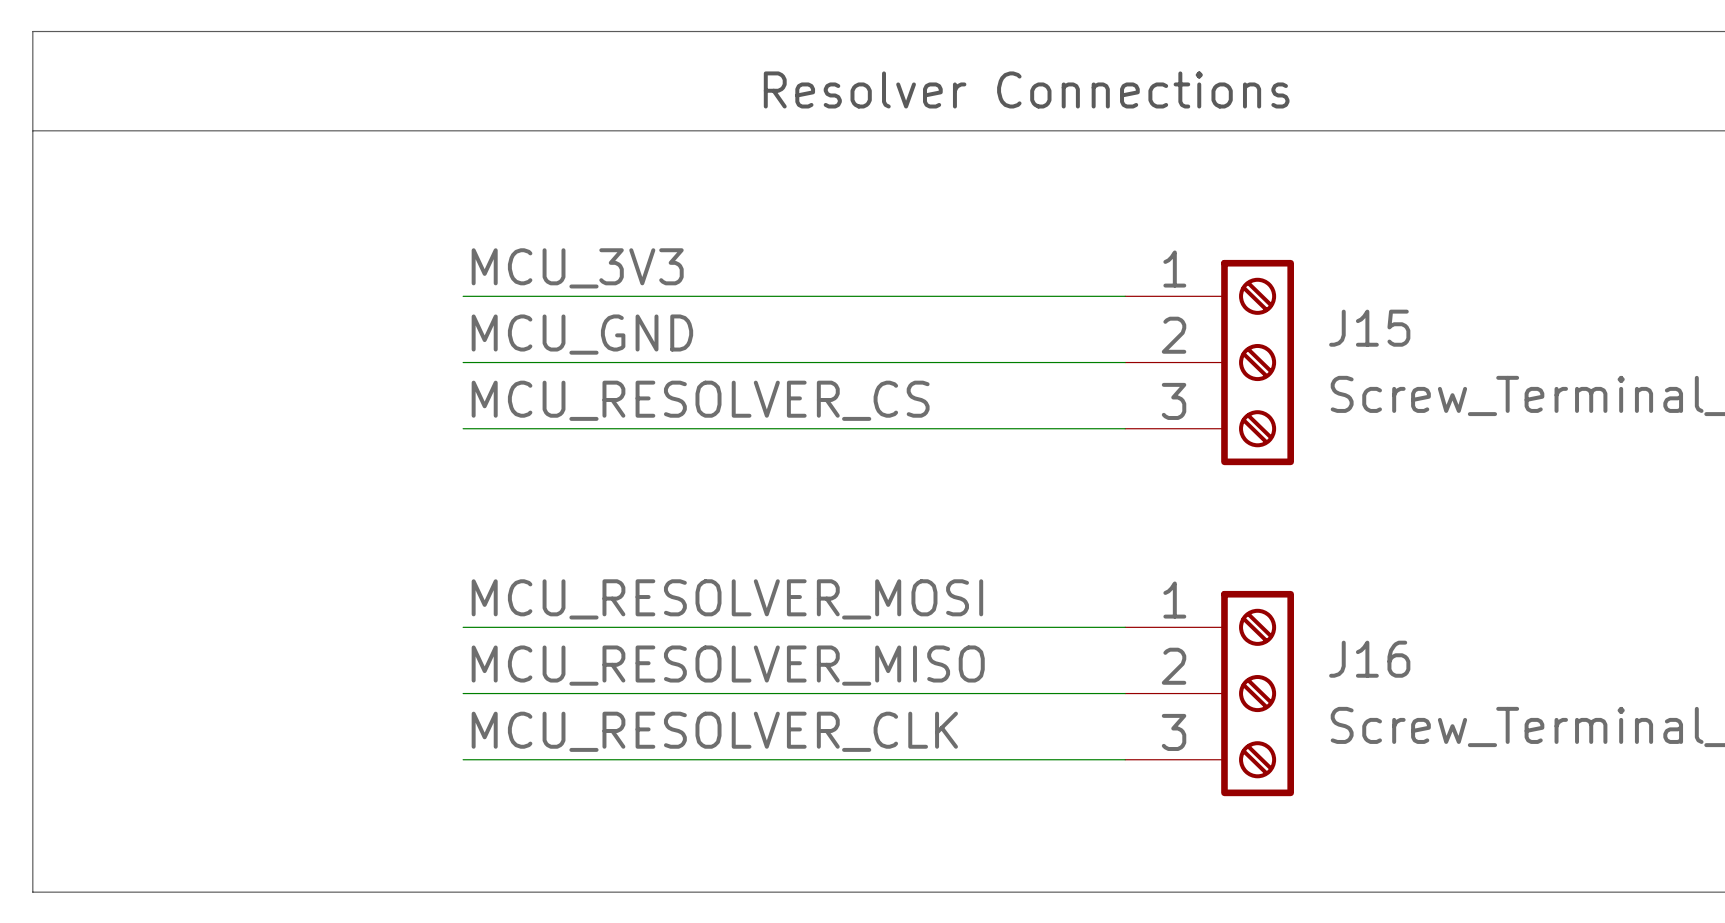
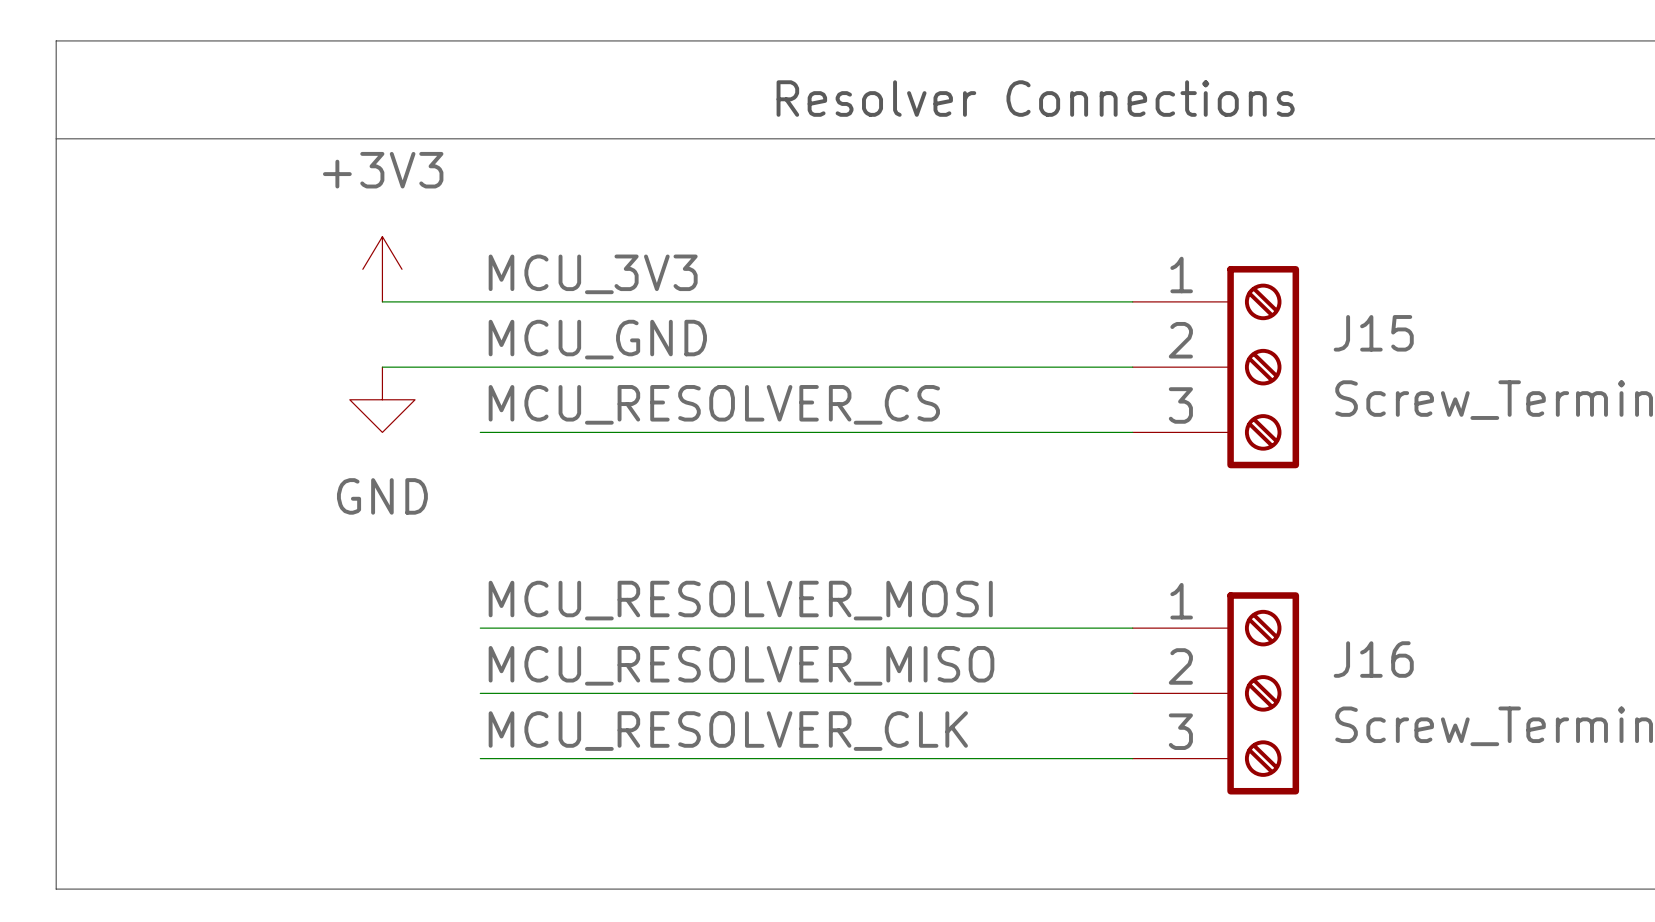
power symbol: none -> +3V3 (382, 269)
wire: none -> (382, 301) (480, 301)
wire: none -> (382, 367) (480, 367)
power symbol: none -> GND (382, 399)

